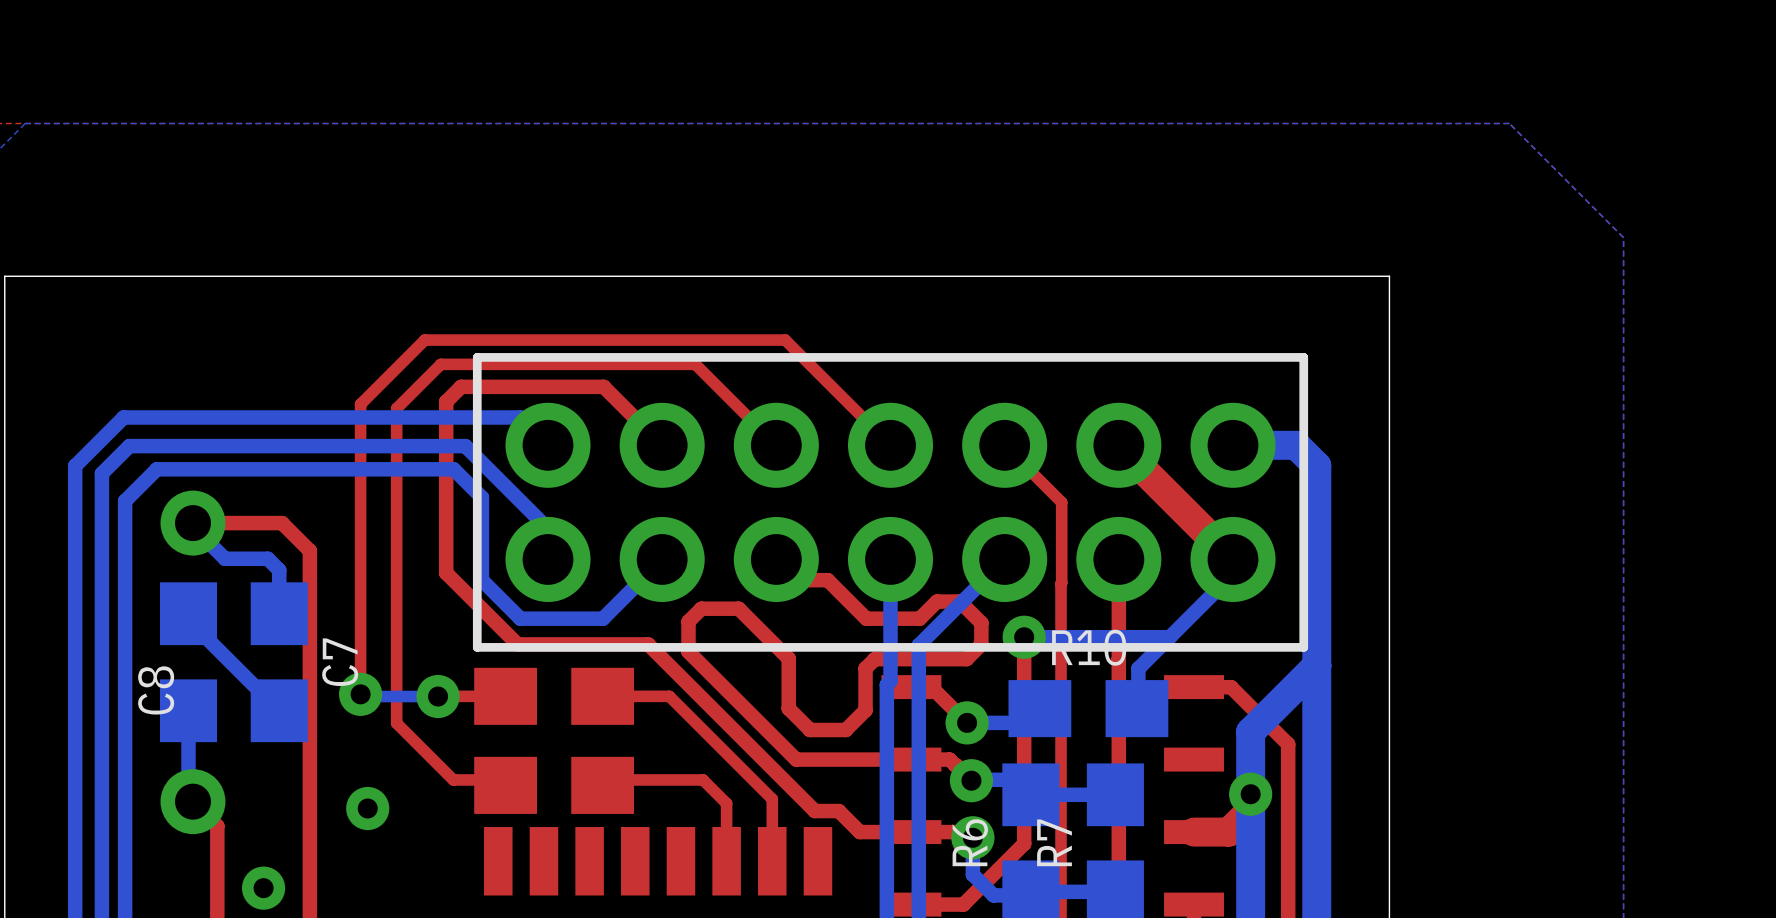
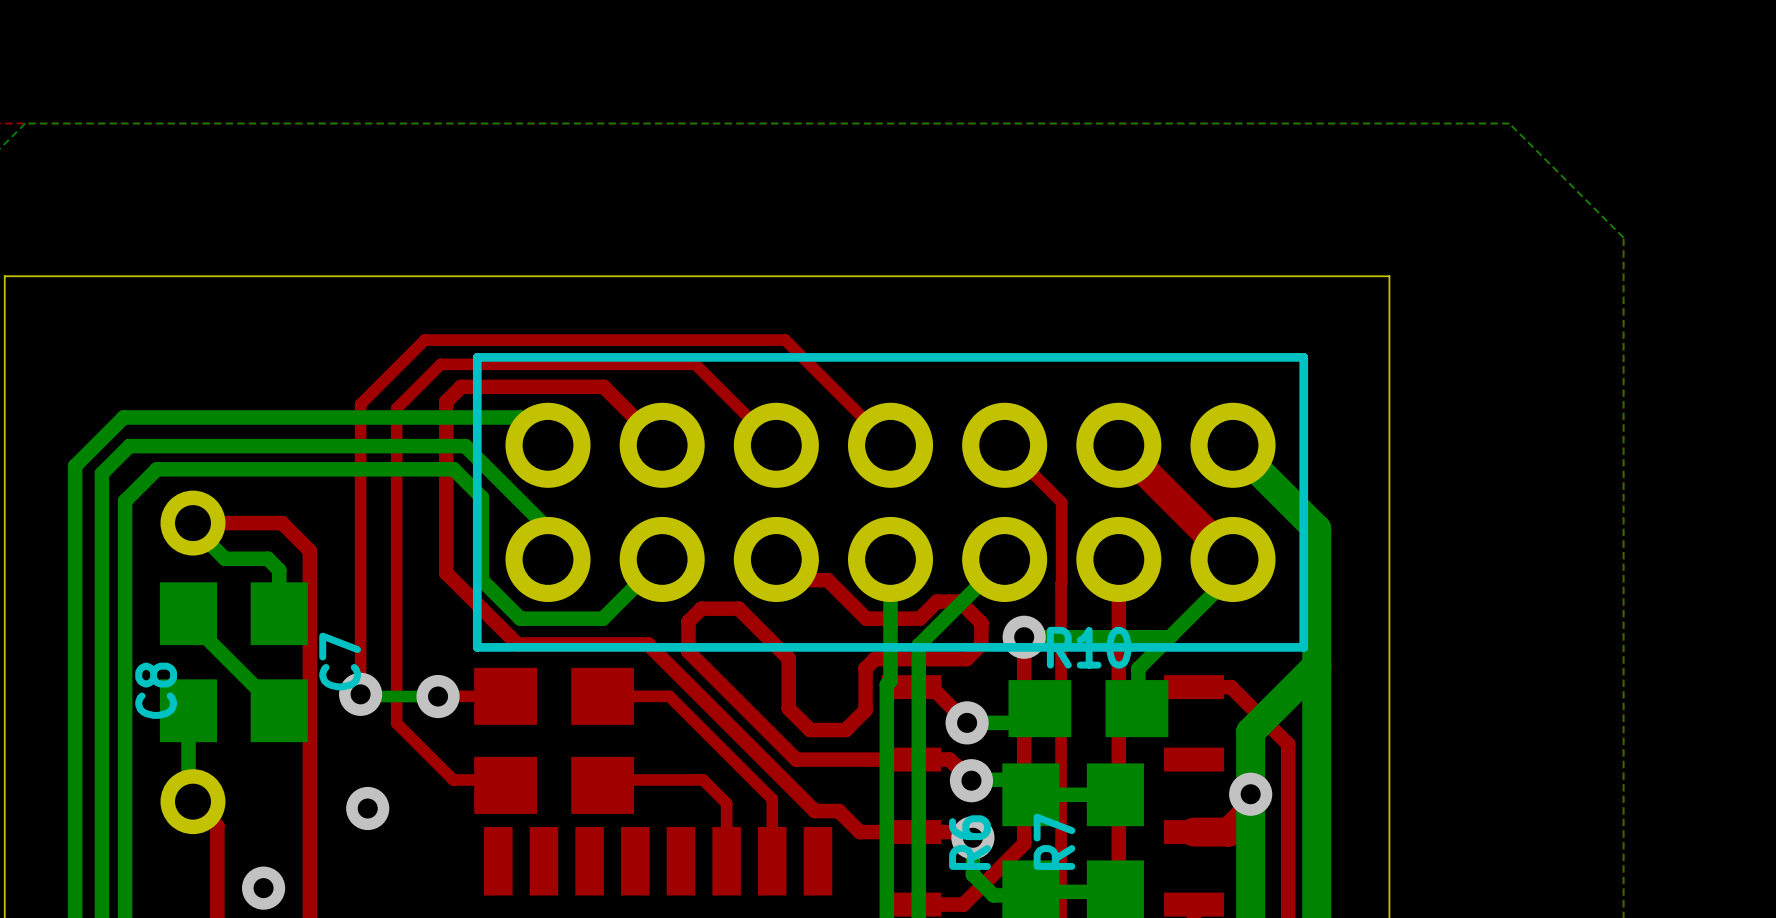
bottom track: (1233, 445) (1296, 445) (1316, 465) (1316, 665) -> (1233, 445) (1316, 529) (1316, 665)

